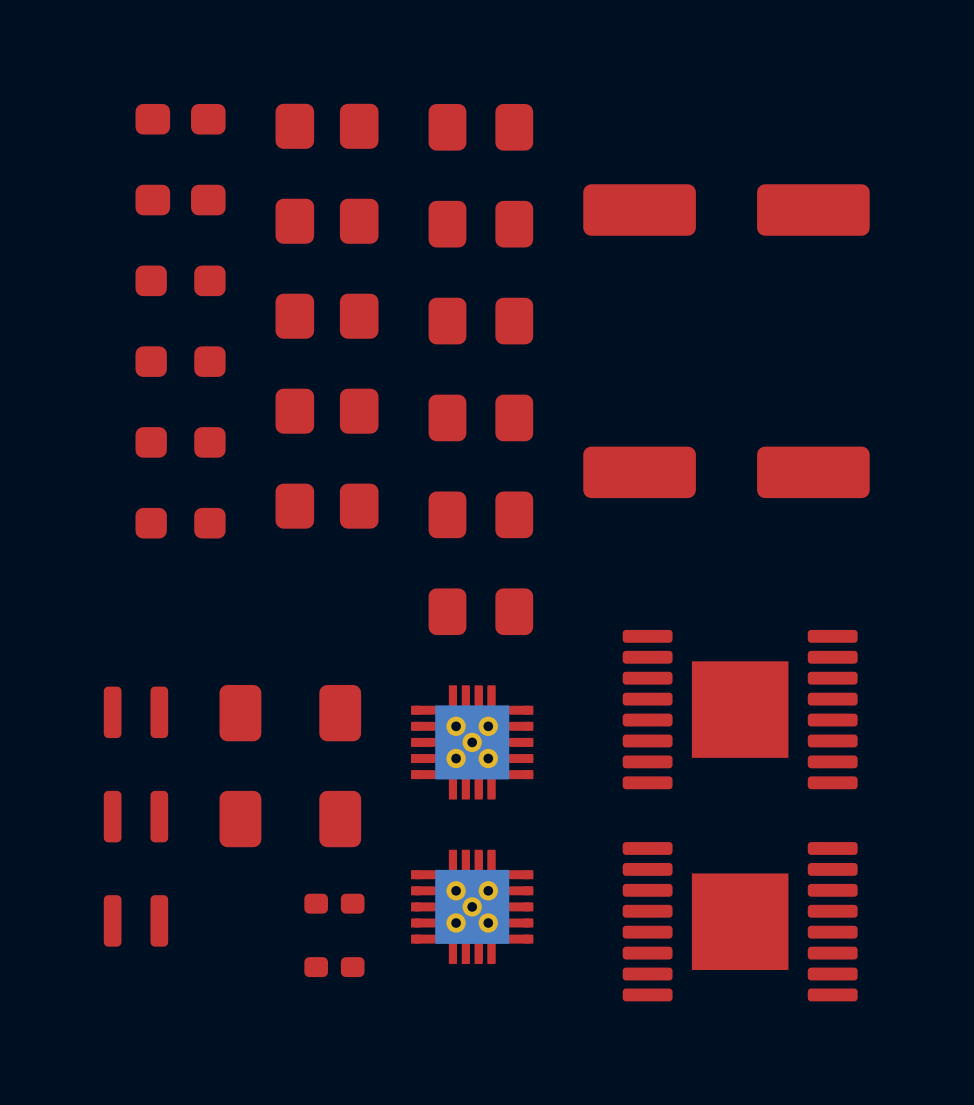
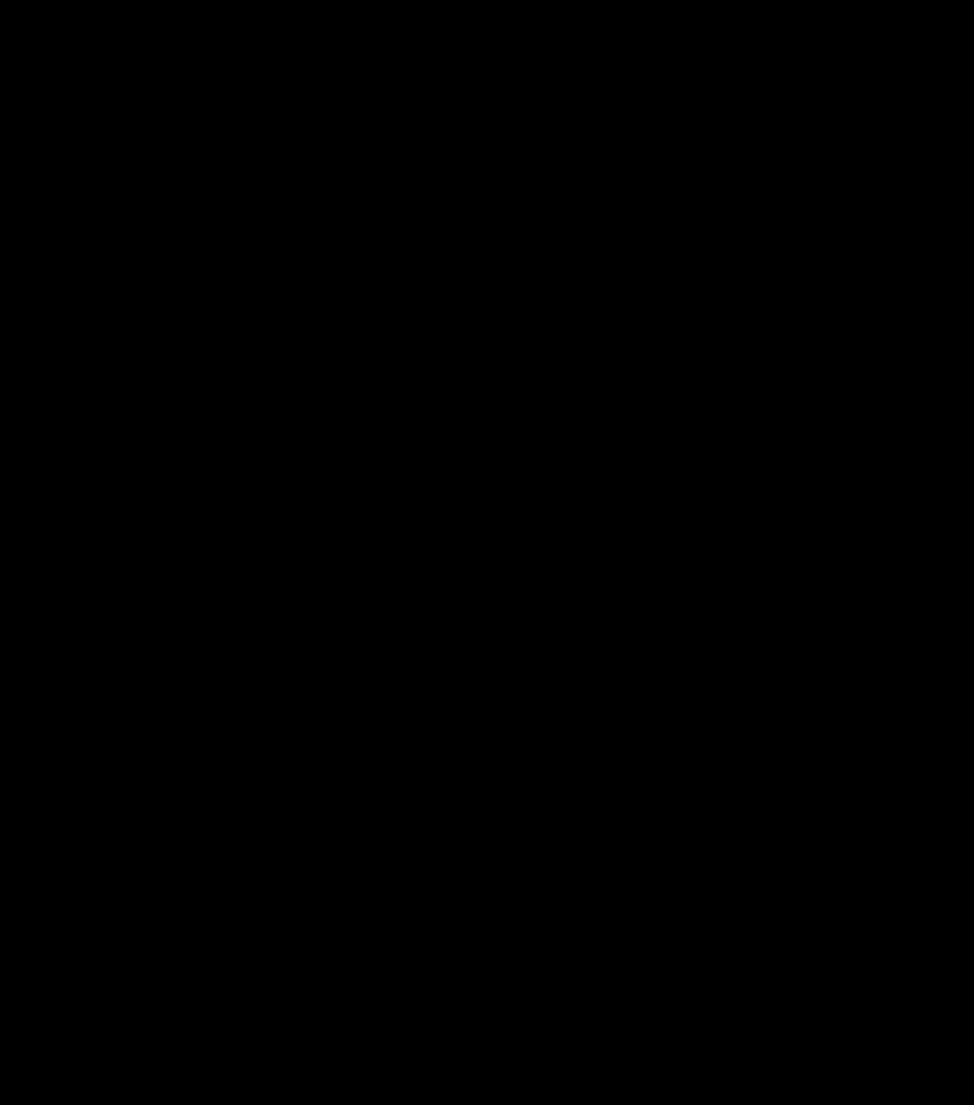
part: (180, 119) -> none
part: (327, 126) -> none
part: (480, 127) -> none
part: (180, 200) -> none
part: (726, 210) -> none
part: (327, 221) -> none
part: (480, 224) -> none
part: (180, 280) -> none
part: (327, 316) -> none
part: (480, 321) -> none
part: (180, 361) -> none
part: (327, 411) -> none
part: (480, 417) -> none
part: (180, 442) -> none
part: (726, 472) -> none
part: (327, 506) -> none
part: (480, 514) -> none
part: (180, 523) -> none
part: (480, 611) -> none
part: (740, 709) -> none
part: (135, 712) -> none
part: (290, 713) -> none
part: (472, 742) -> none
part: (135, 816) -> none
part: (290, 819) -> none
part: (334, 903) -> none
part: (472, 906) -> none
part: (135, 920) -> none
part: (740, 921) -> none
part: (334, 967) -> none

